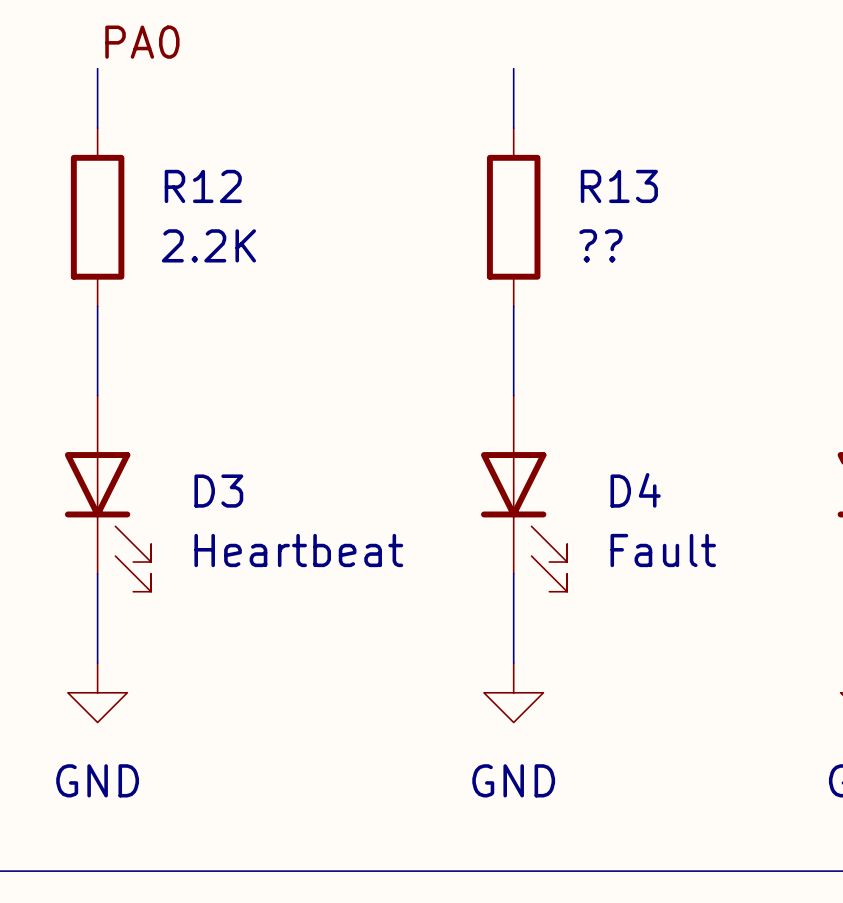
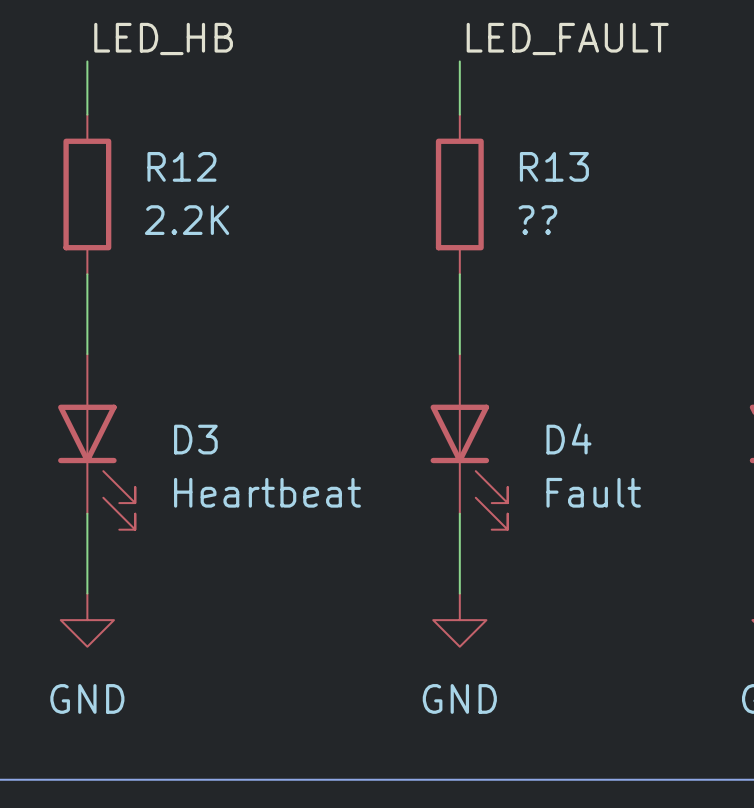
label: PA0 (142, 42) -> LED_HB (163, 38)
label: none -> LED_FAULT (567, 38)

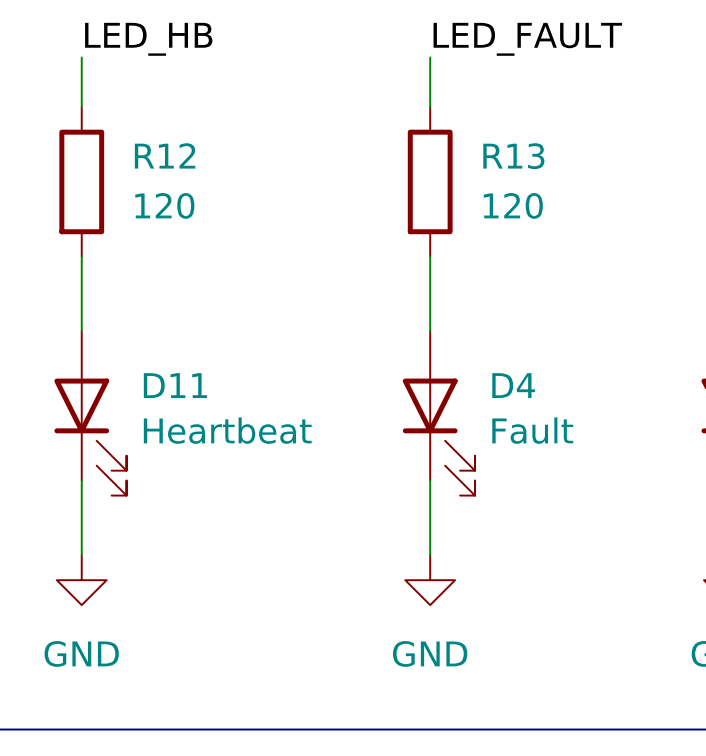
R12 value: 2.2K (187, 220) -> 120 (164, 205)
R13 value: ?? (537, 220) -> 120 (513, 205)
D4 name position: D4 (568, 438) -> D4 (513, 385)
D3 name: D3 (195, 439) -> D11 (175, 385)
D3 value position: Heartbeat (267, 492) -> Heartbeat (227, 430)
D4 value position: Fault (593, 492) -> Fault (532, 430)

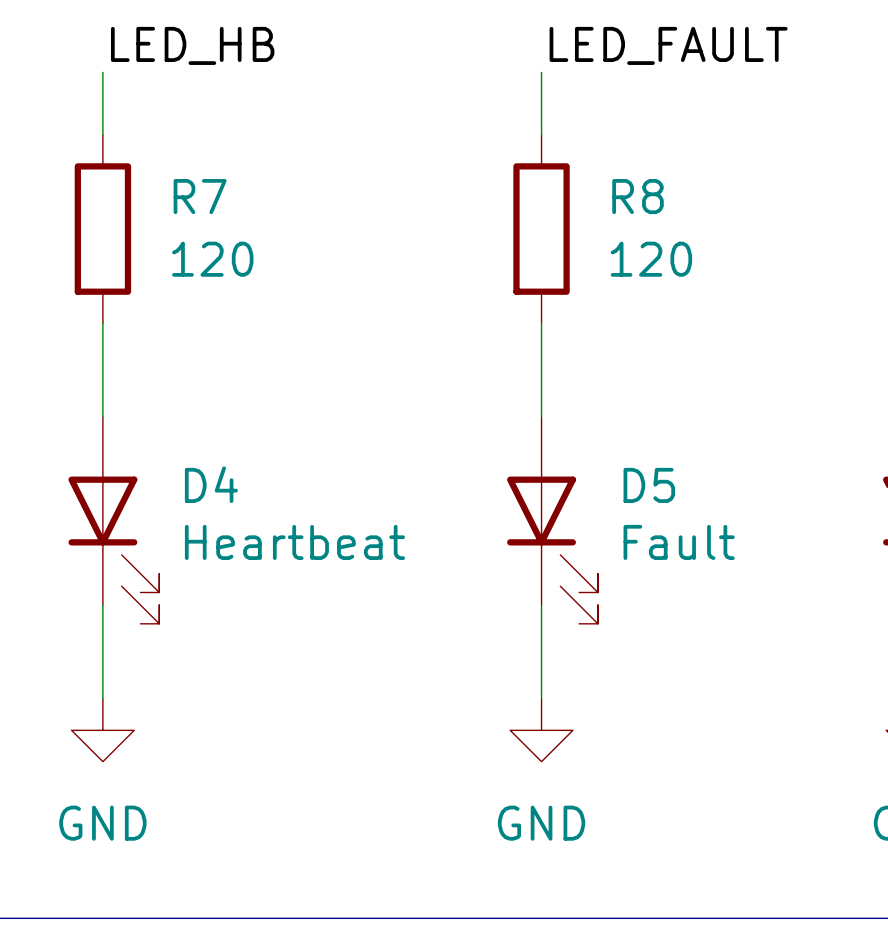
R12 name: R12 (165, 155) -> R7 (200, 196)
R13 name: R13 (513, 156) -> R8 (638, 196)
D11 name: D11 (175, 385) -> D4 (211, 484)
D4 name: D4 (513, 385) -> D5 (649, 485)

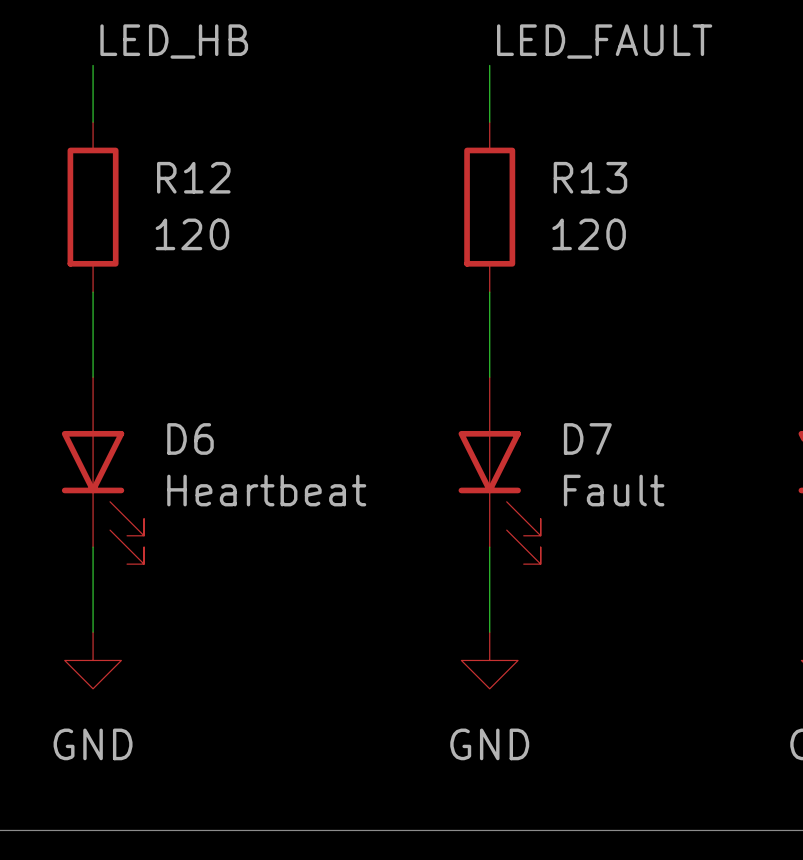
R7 name: R7 (200, 196) -> R12 (193, 177)
R8 name: R8 (638, 196) -> R13 (590, 177)
D4 name: D4 (211, 484) -> D6 (190, 438)
D5 name: D5 (649, 485) -> D7 (587, 438)

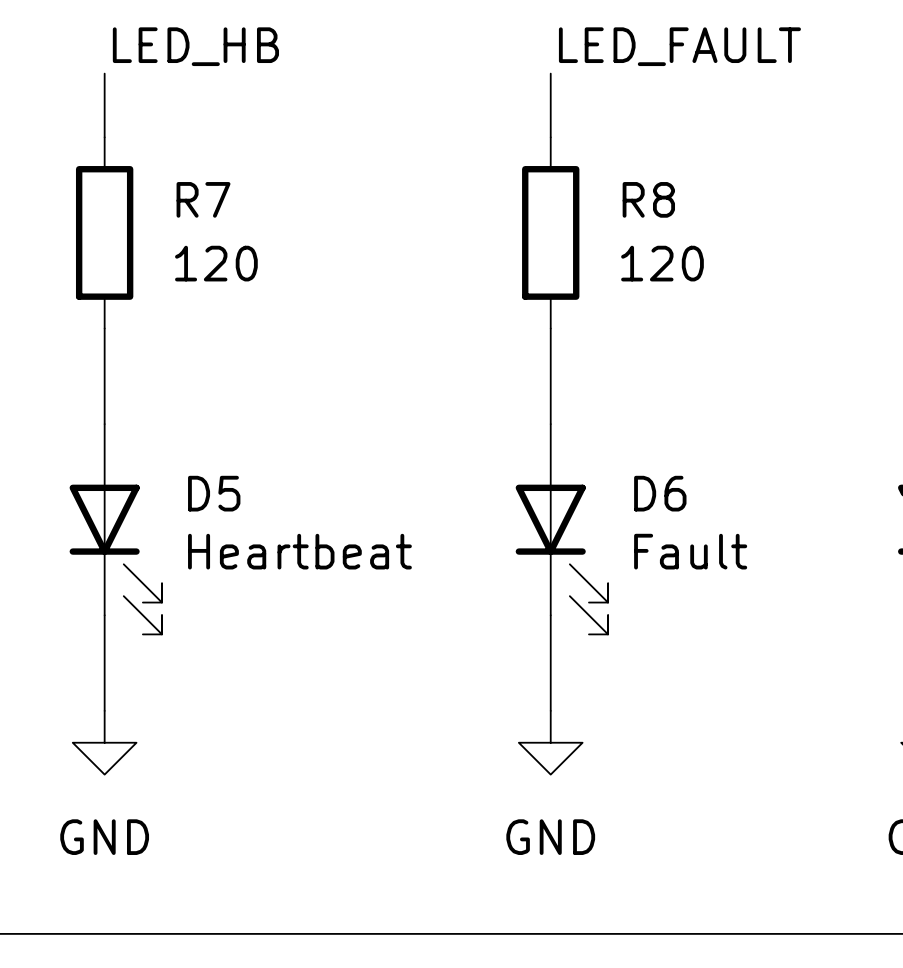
R12 name: R12 (193, 177) -> R7 (203, 199)
R13 name: R13 (590, 177) -> R8 (648, 199)
D6 name: D6 (190, 438) -> D5 (214, 493)
D7 name: D7 (587, 438) -> D6 (660, 493)

